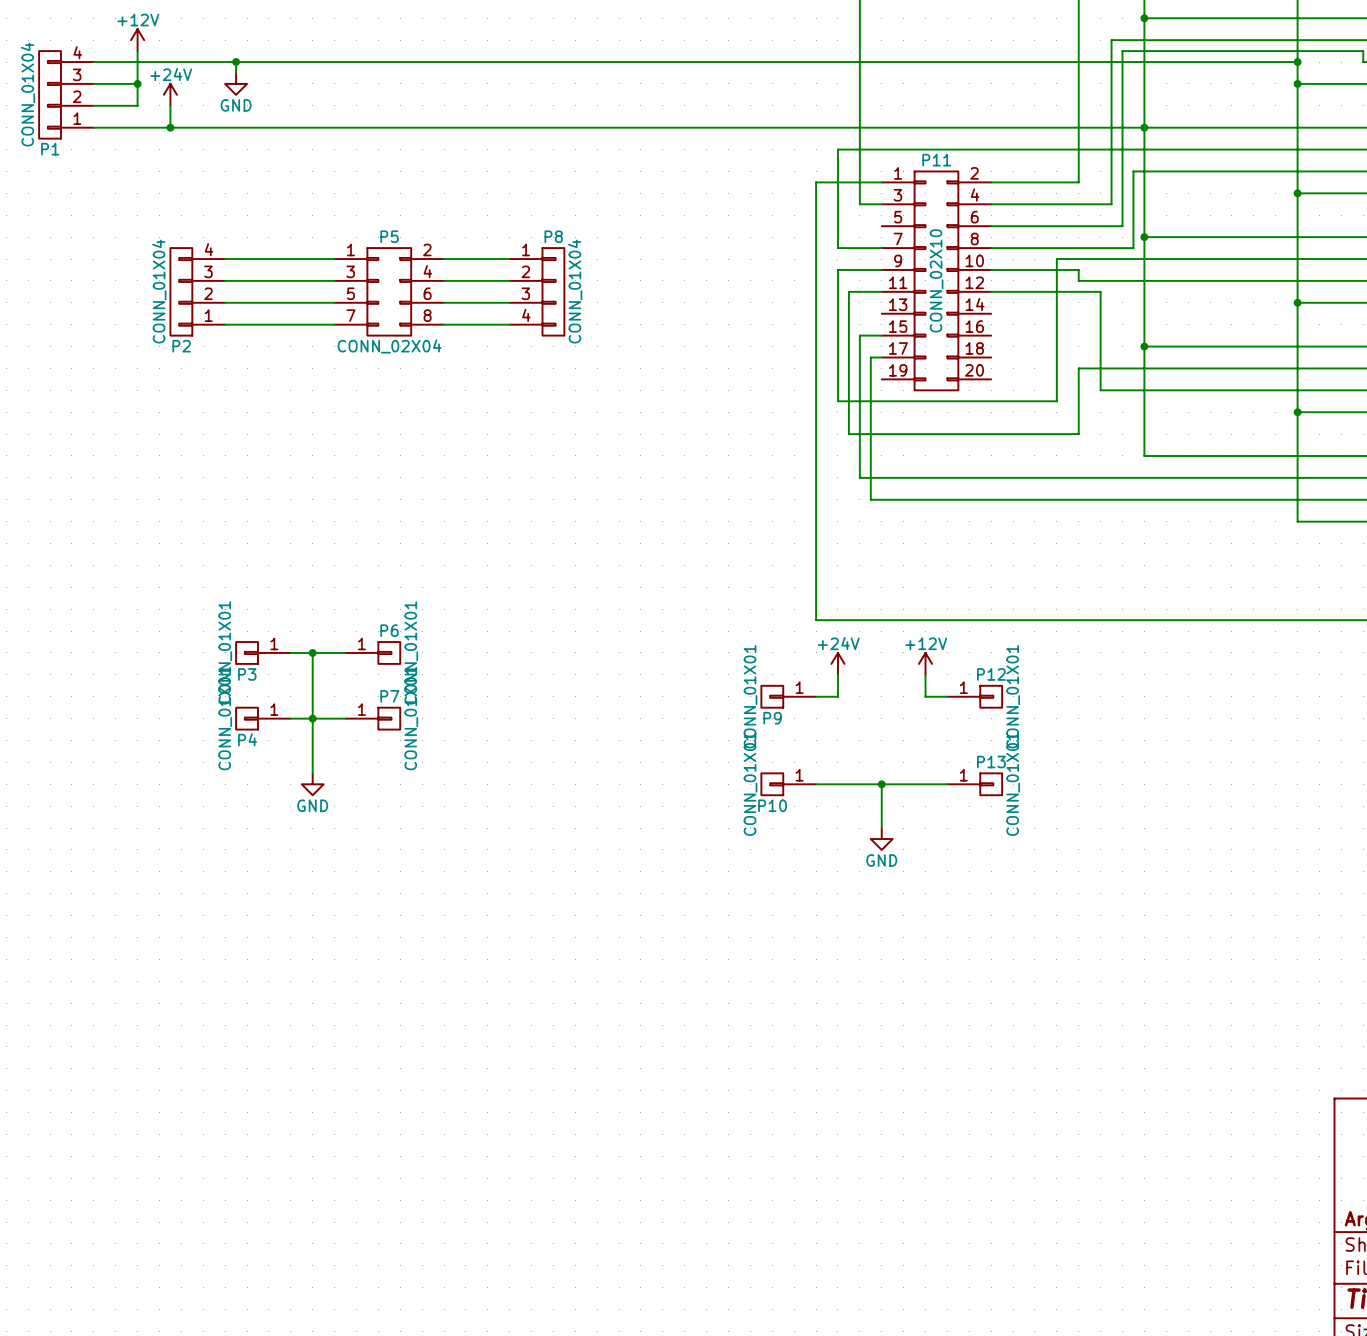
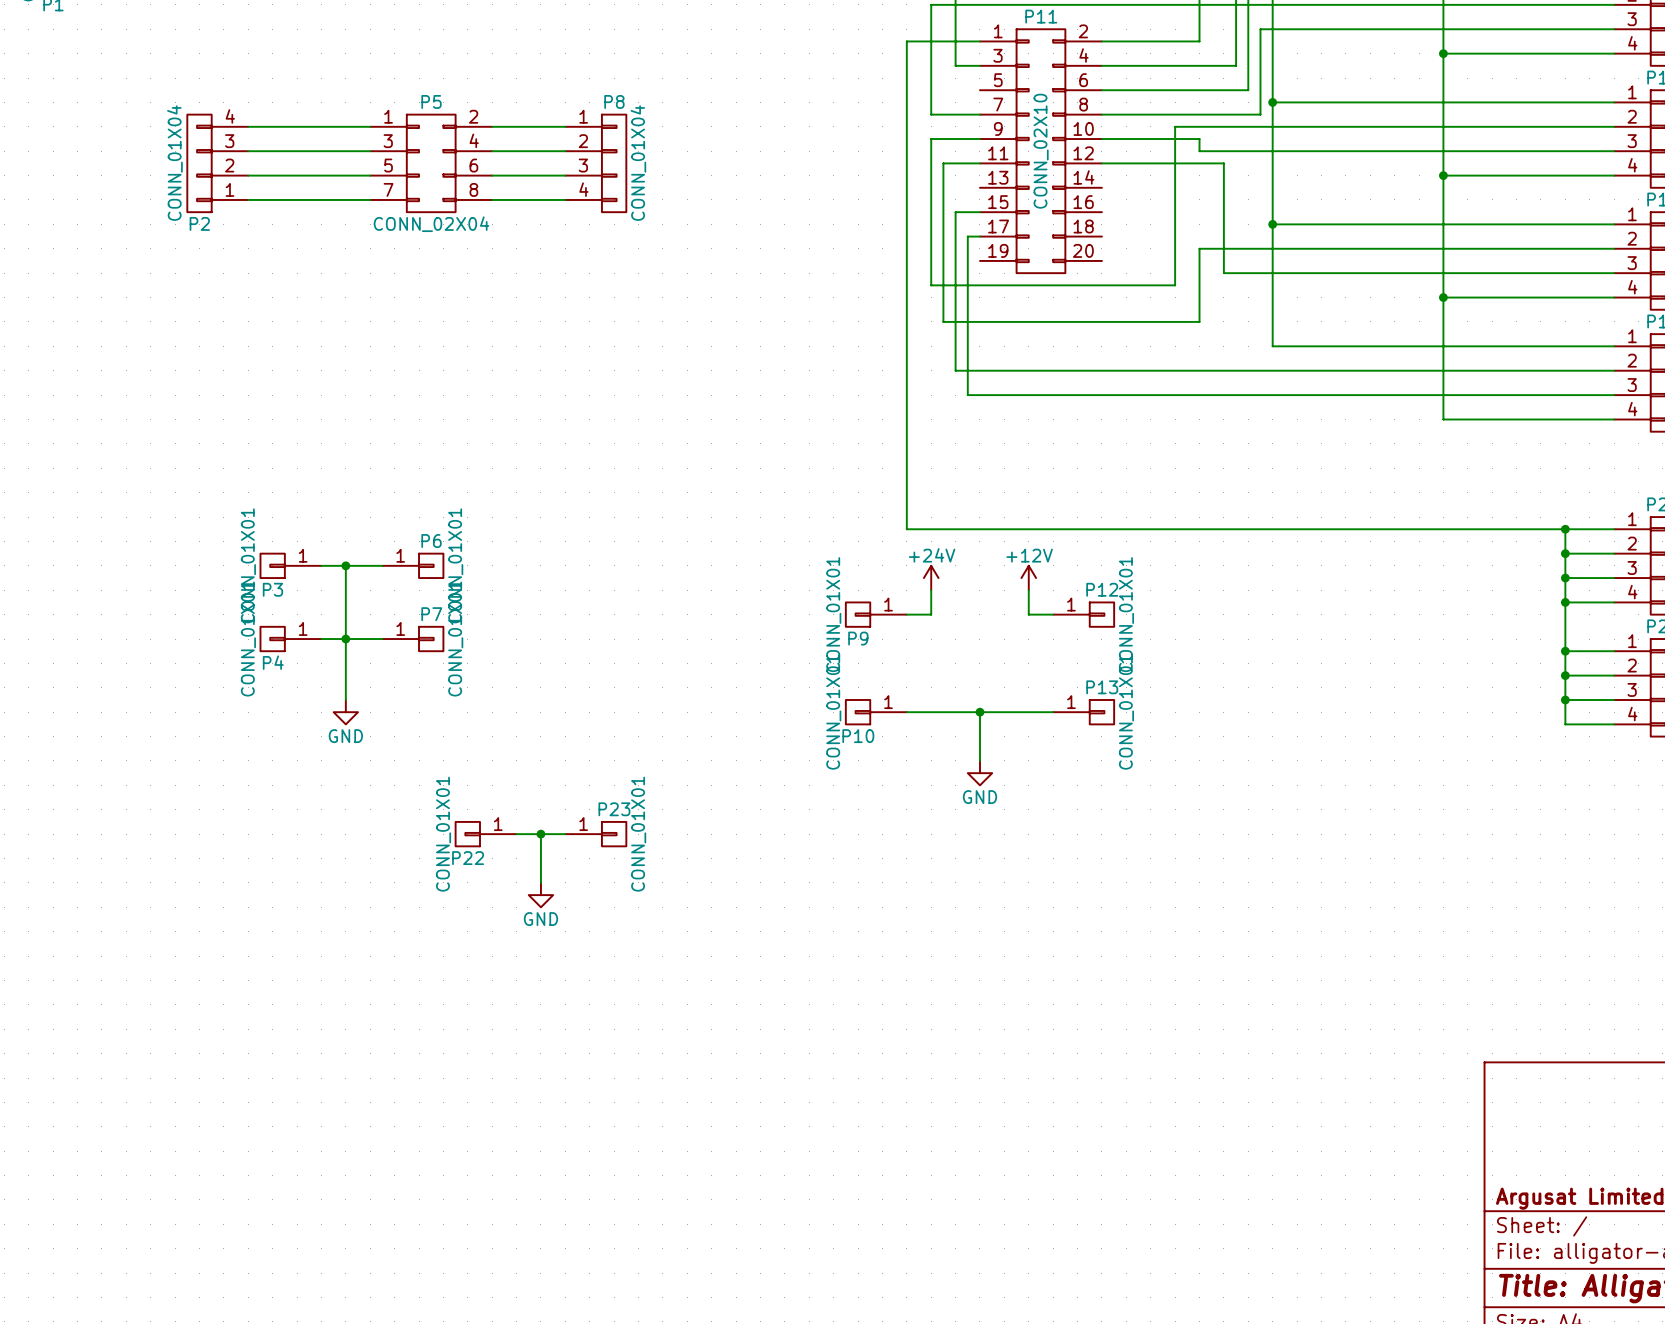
P22: none -> CONN_01X01 (486, 834)
wire: none -> (516, 834) (565, 834)
wire: none -> (540, 834) (540, 882)
junction: none -> (540, 834)
P23: none -> CONN_01X01 (595, 834)
power symbol: none -> GND (540, 895)

